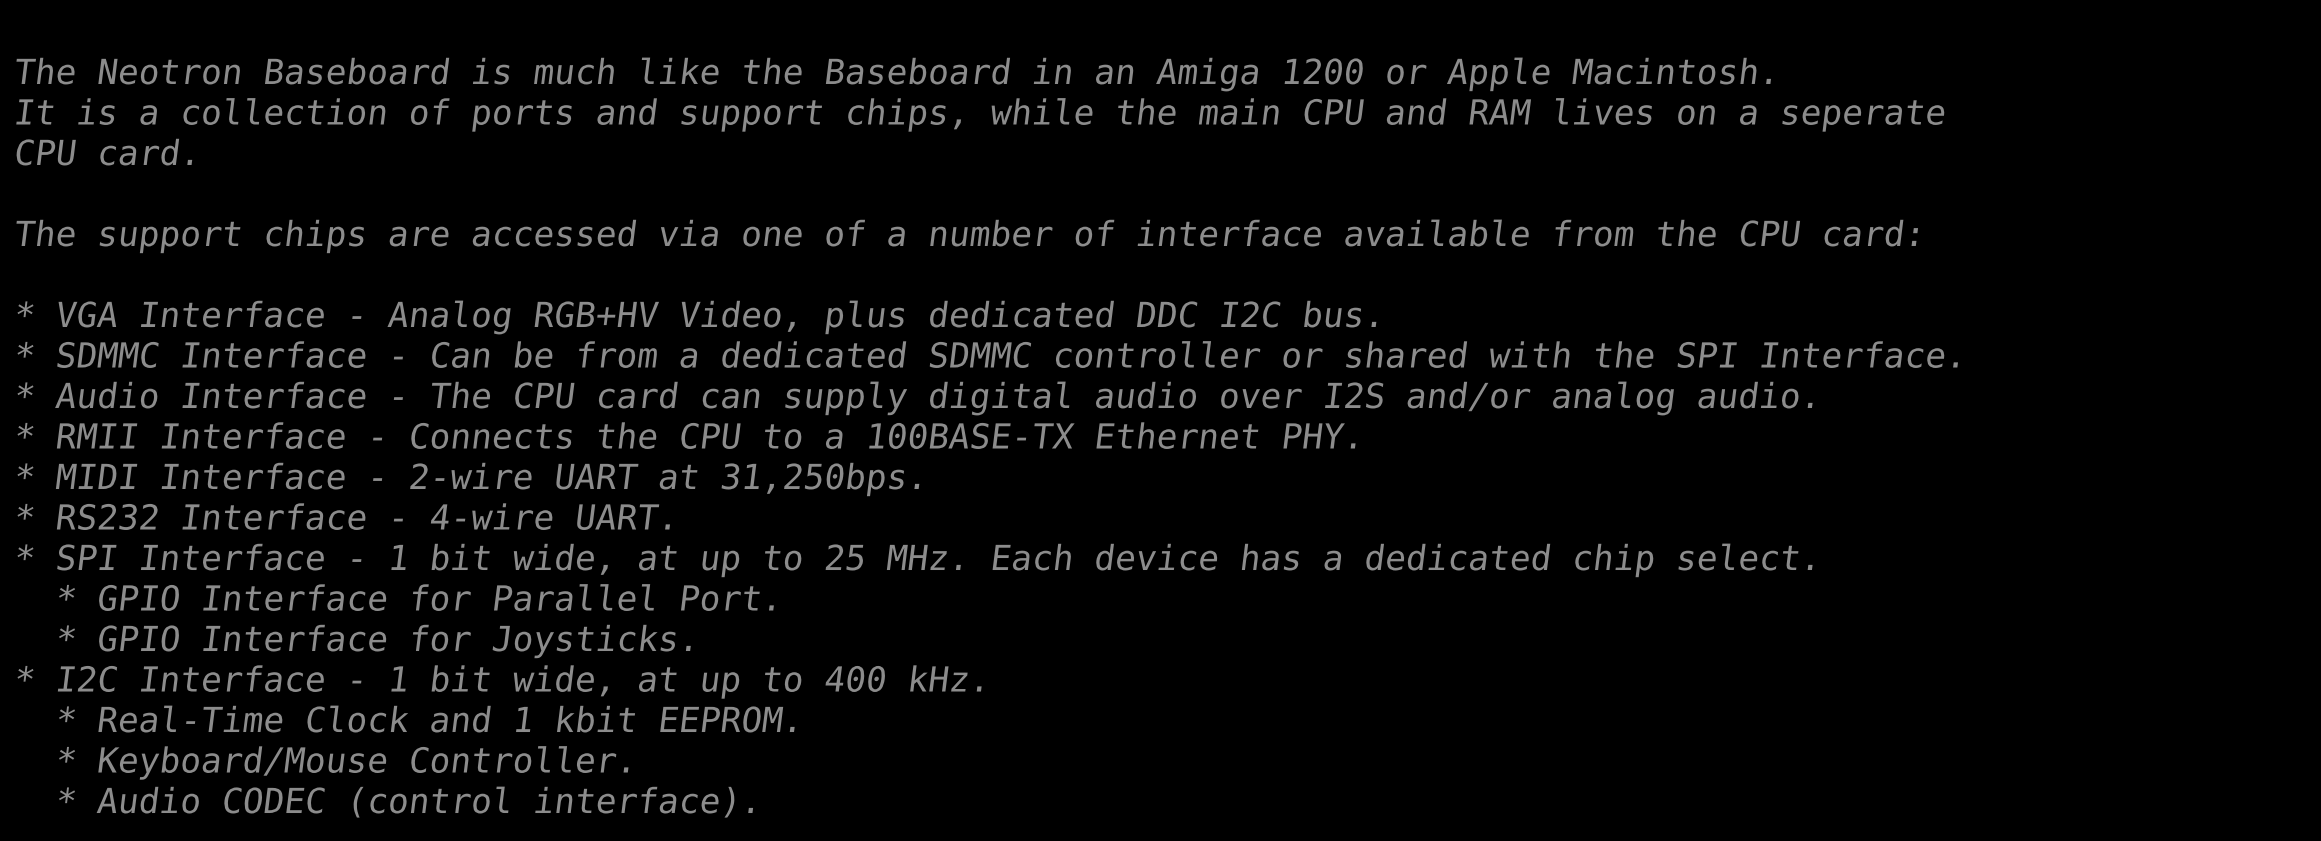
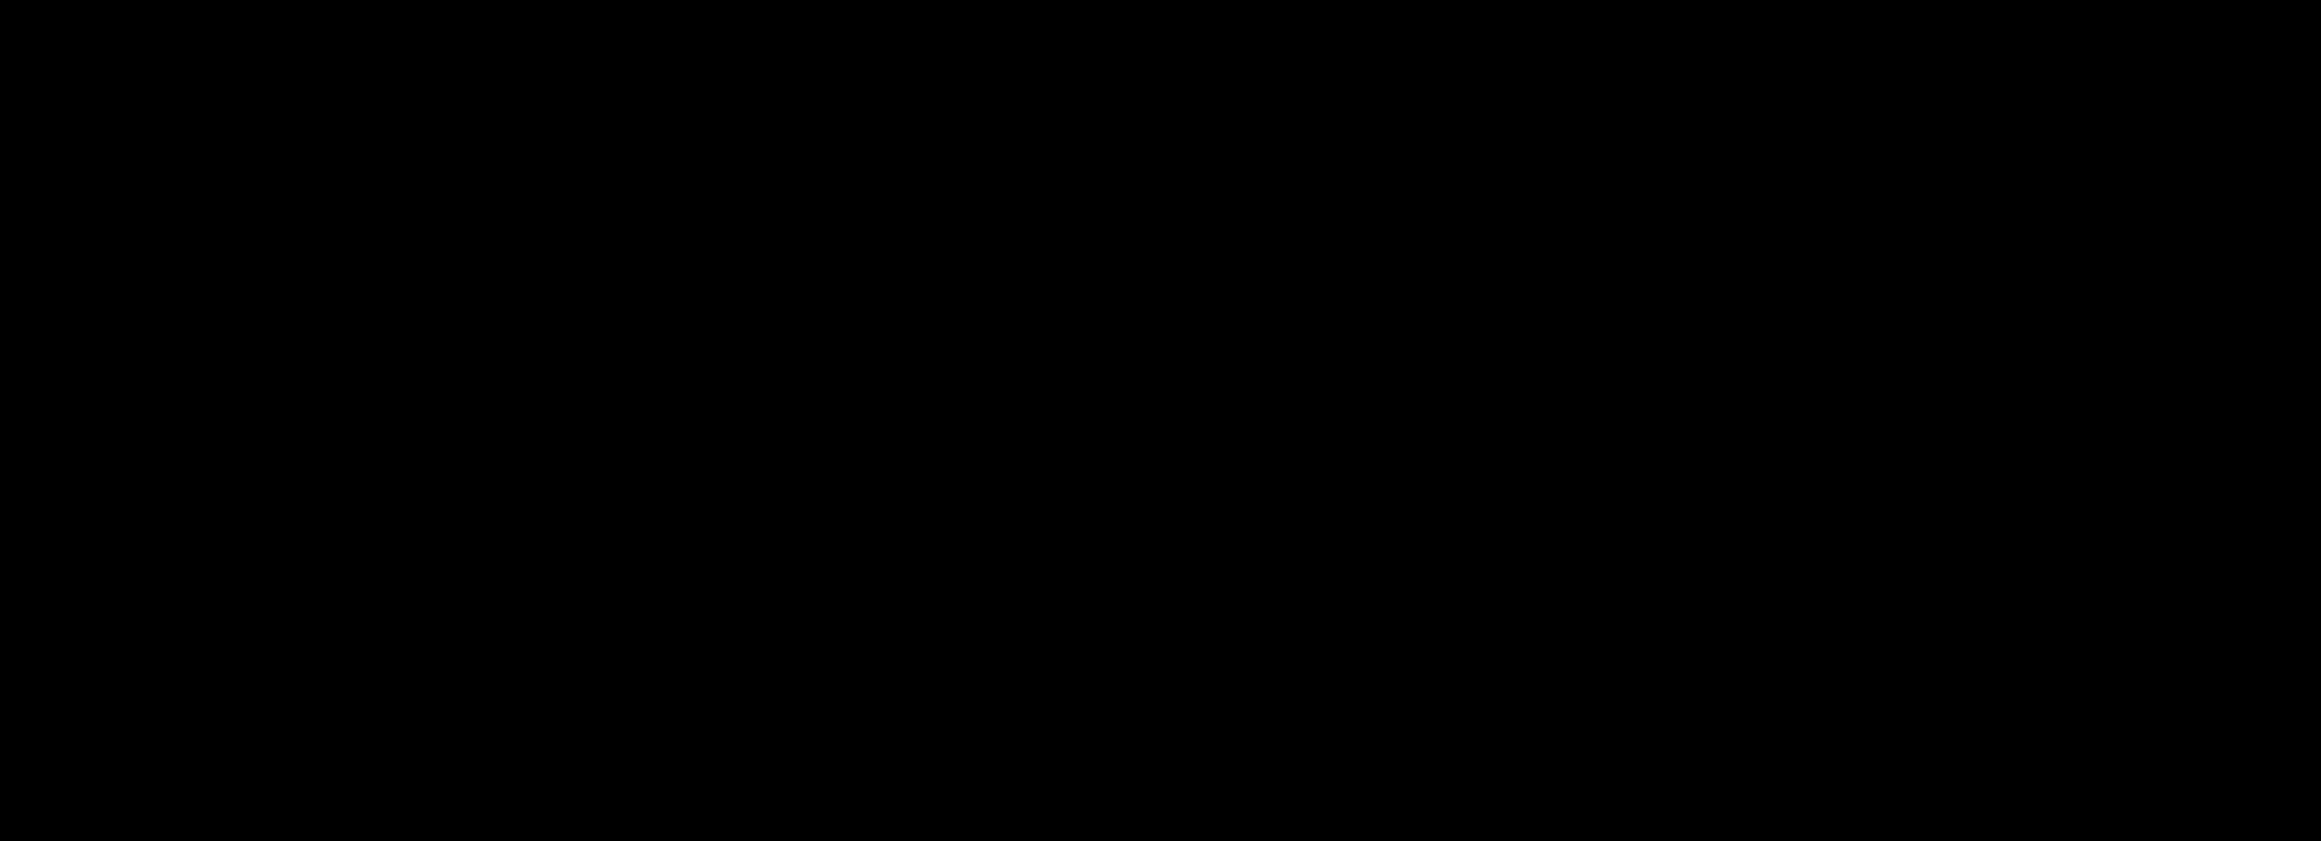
text: The Neotron Baseboard is much like the Baseboard in an Amiga 1200 or Apple Macintosh. (893, 74) -> none
text: It is a collection of ports and support chips, while the main CPU and RAM lives on a seperate (980, 114) -> none
text: CPU card. (104, 152) -> none
text: The support chips are accessed via one of a number of interface available from the CPU card: (967, 236) -> none
text: * VGA Interface - Analog RGB+HV Video, plus dedicated DDC I2C bus. (696, 317) -> none
text: * SDMMC Interface - Can be from a dedicated SDMMC controller or shared with the SPI Interface. (987, 354) -> none
text: * Audio Interface - The CPU card can supply digital audio over I2S and/or analog audio. (915, 398) -> none
text: * RMII Interface - Connects the CPU to a 100BASE-TX Ethernet PHY. (686, 435) -> none
text: * MIDI Interface - 2-wire UART at 31,250bps. (468, 479) -> none
text: * RS232 Interface - 4-wire UART. (343, 516) -> none
text: * SPI Interface - 1 bit wide, at up to 25 MHz. Each device has a dedicated chip select. (915, 560) -> none
text: * GPIO Interface for Parallel Port. (416, 597) -> none
text: * GPIO Interface for Joysticks. (374, 641) -> none
text: * I2C Interface - 1 bit wide, at up to 400 kHz. (499, 682) -> none
text: * Real-Time Clock and 1 kbit EEPROM. (426, 719) -> none
text: * Keyboard/Mouse Controller. (343, 762) -> none
text: * Audio CODEC (control interface). (406, 802) -> none

